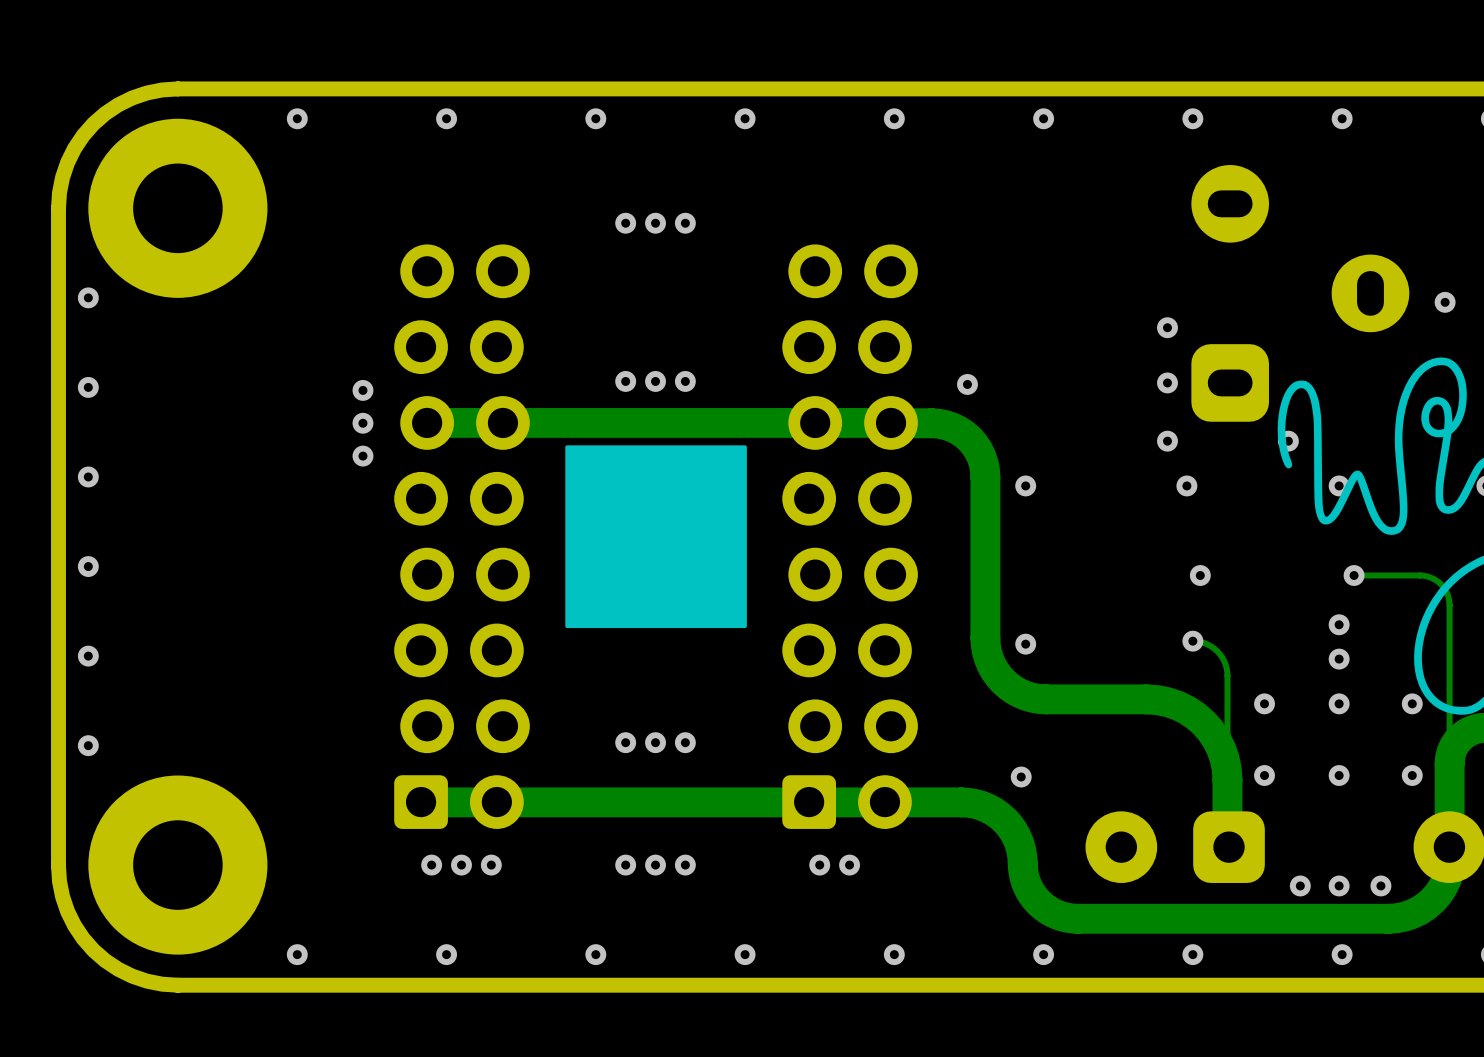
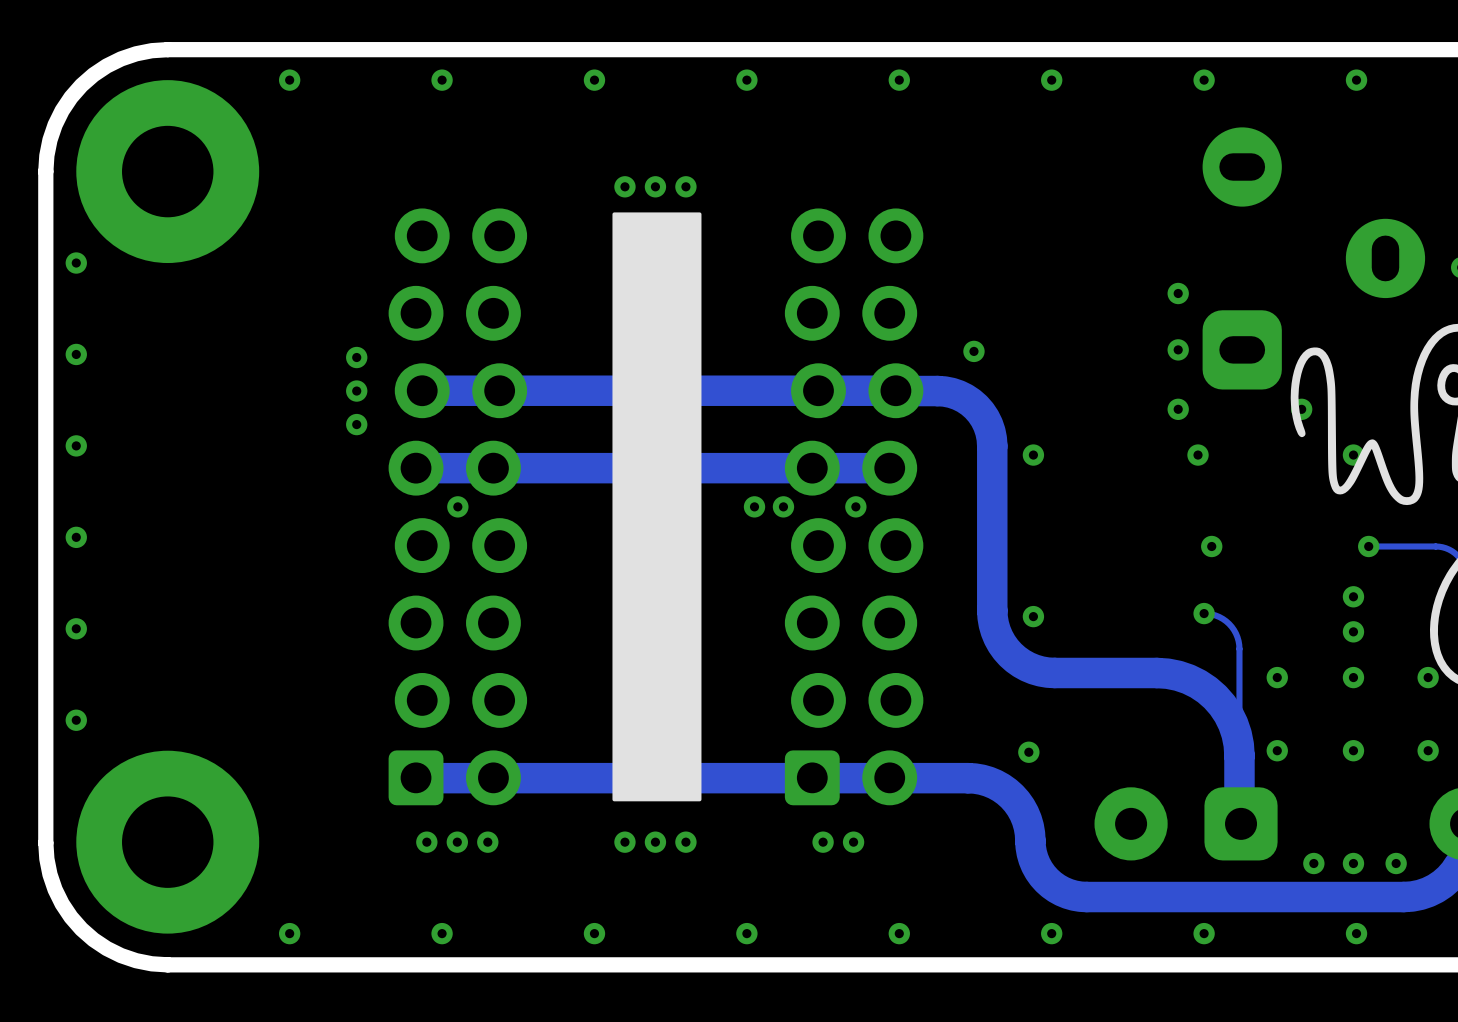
via: (625, 381) -> none
via: (655, 381) -> none
via: (685, 381) -> none
drawing shape: [565, 445, 747, 629] -> [612, 212, 702, 802]
track: none -> (892, 468) (419, 468)
via: none -> (457, 506)
via: none -> (754, 506)
via: none -> (783, 506)
via: none -> (855, 506)

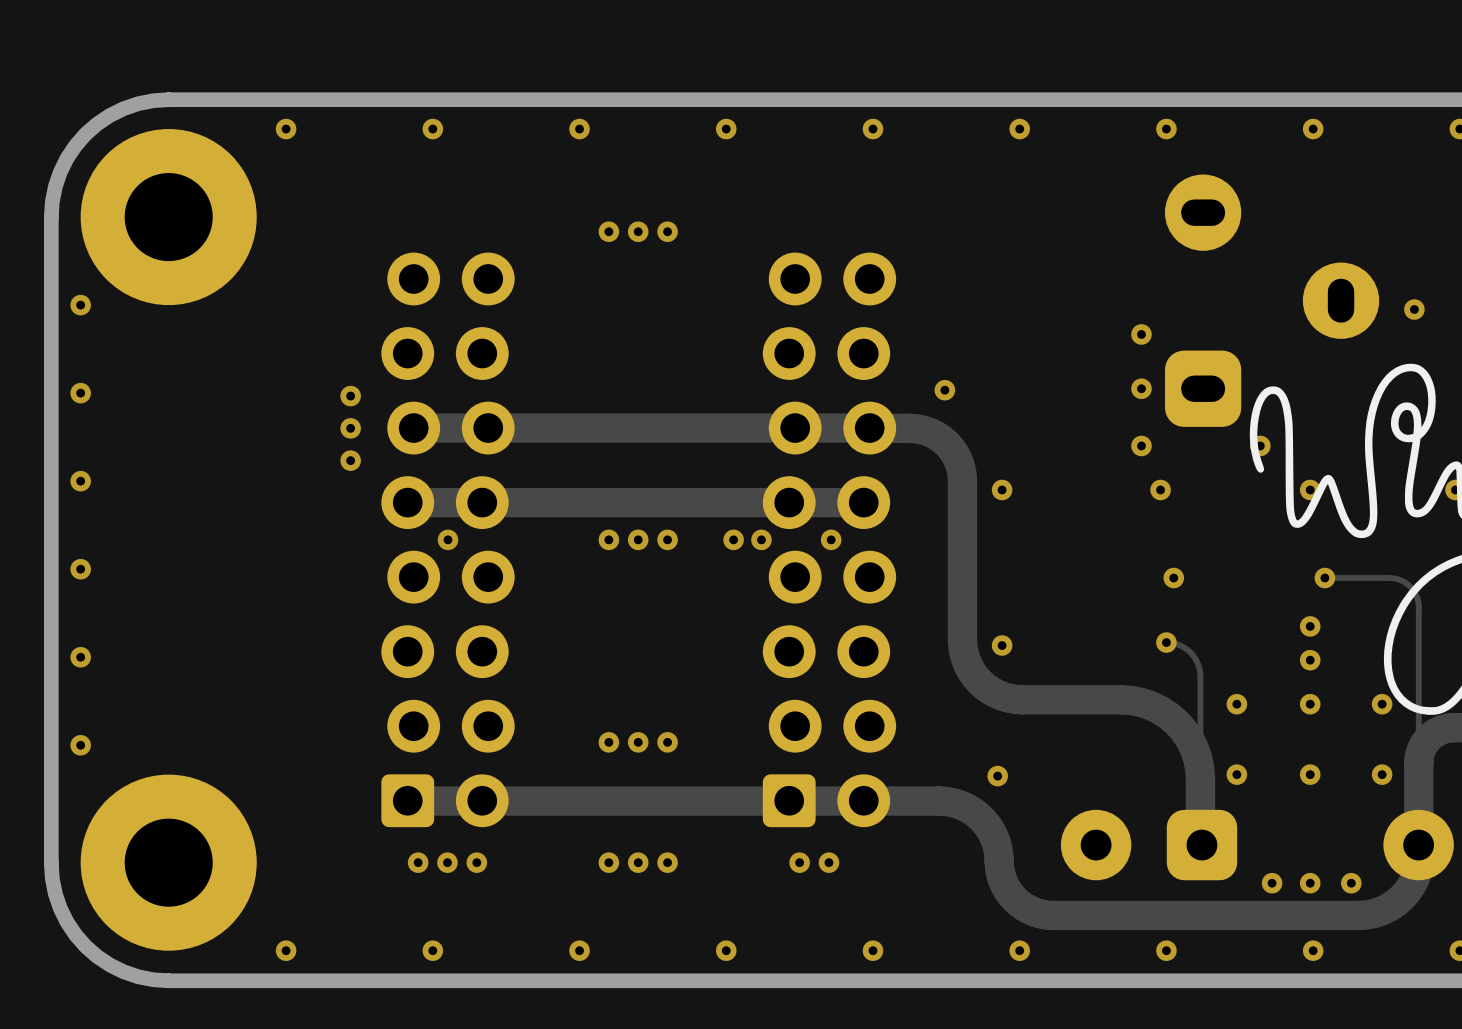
drawing: [612, 212, 702, 802] -> none

